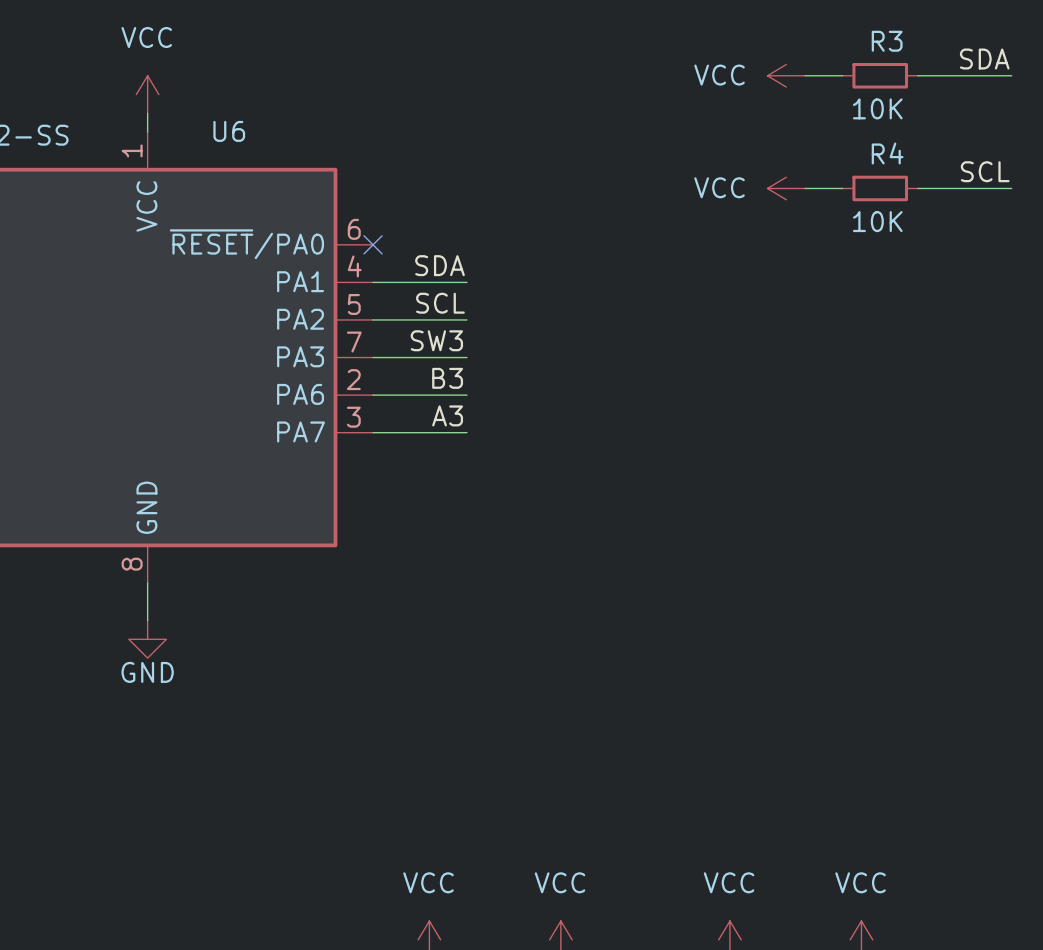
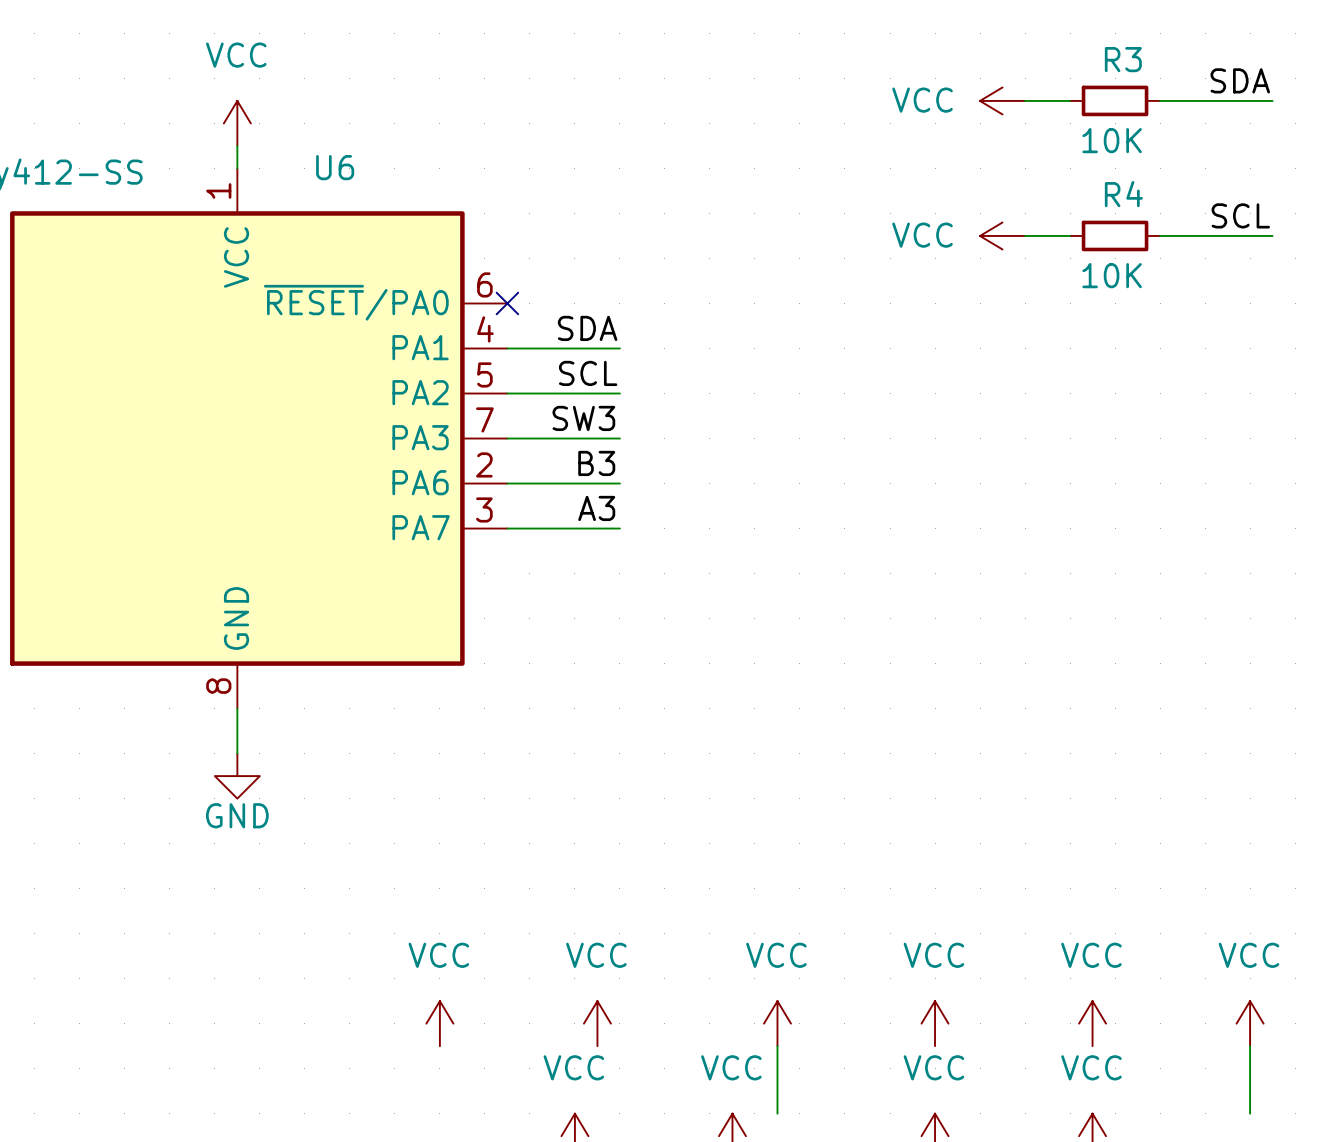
power symbol: none -> VCC (439, 1023)
power symbol: none -> VCC (597, 1023)
power symbol: none -> VCC (777, 1023)
power symbol: none -> VCC (935, 1023)
power symbol: none -> VCC (1092, 1023)
power symbol: none -> VCC (1250, 1023)
wire: none -> (777, 1046) (777, 1113)
wire: none -> (1250, 1046) (1250, 1113)

